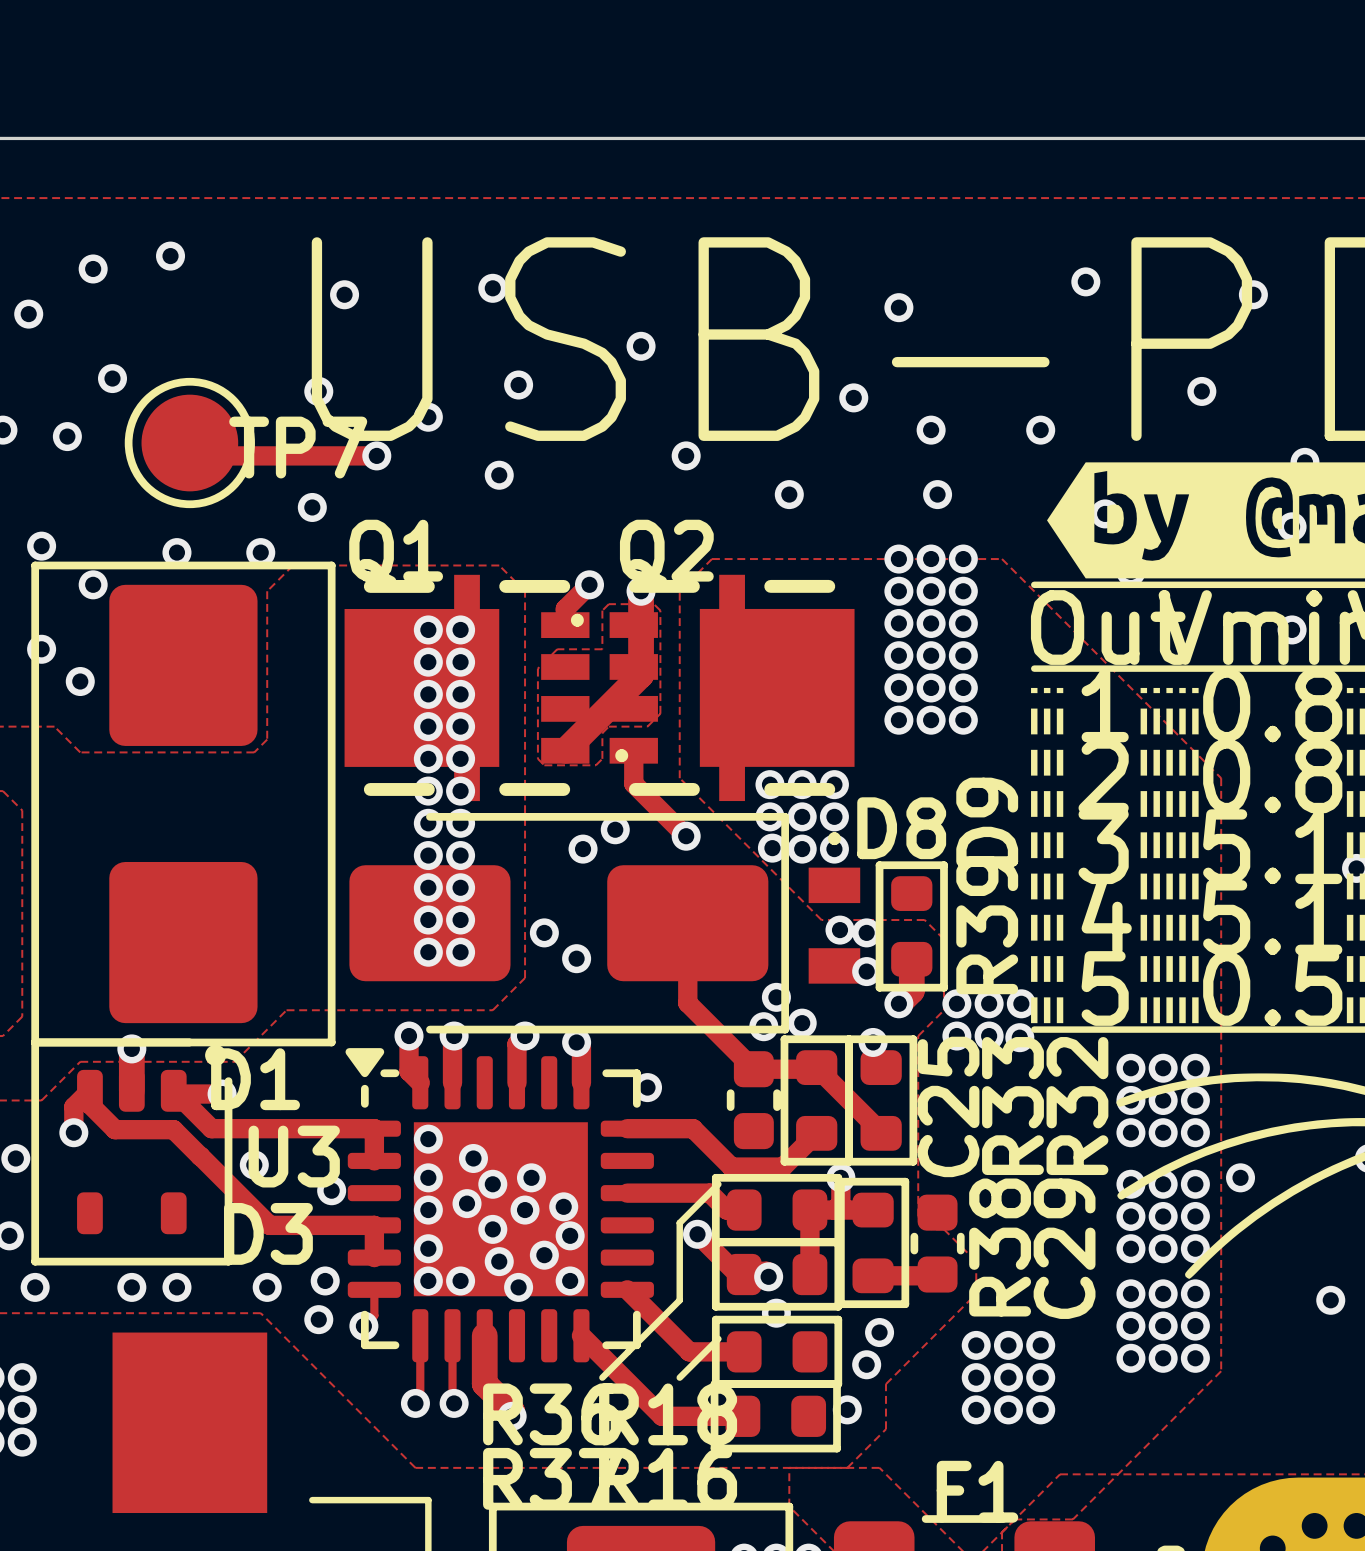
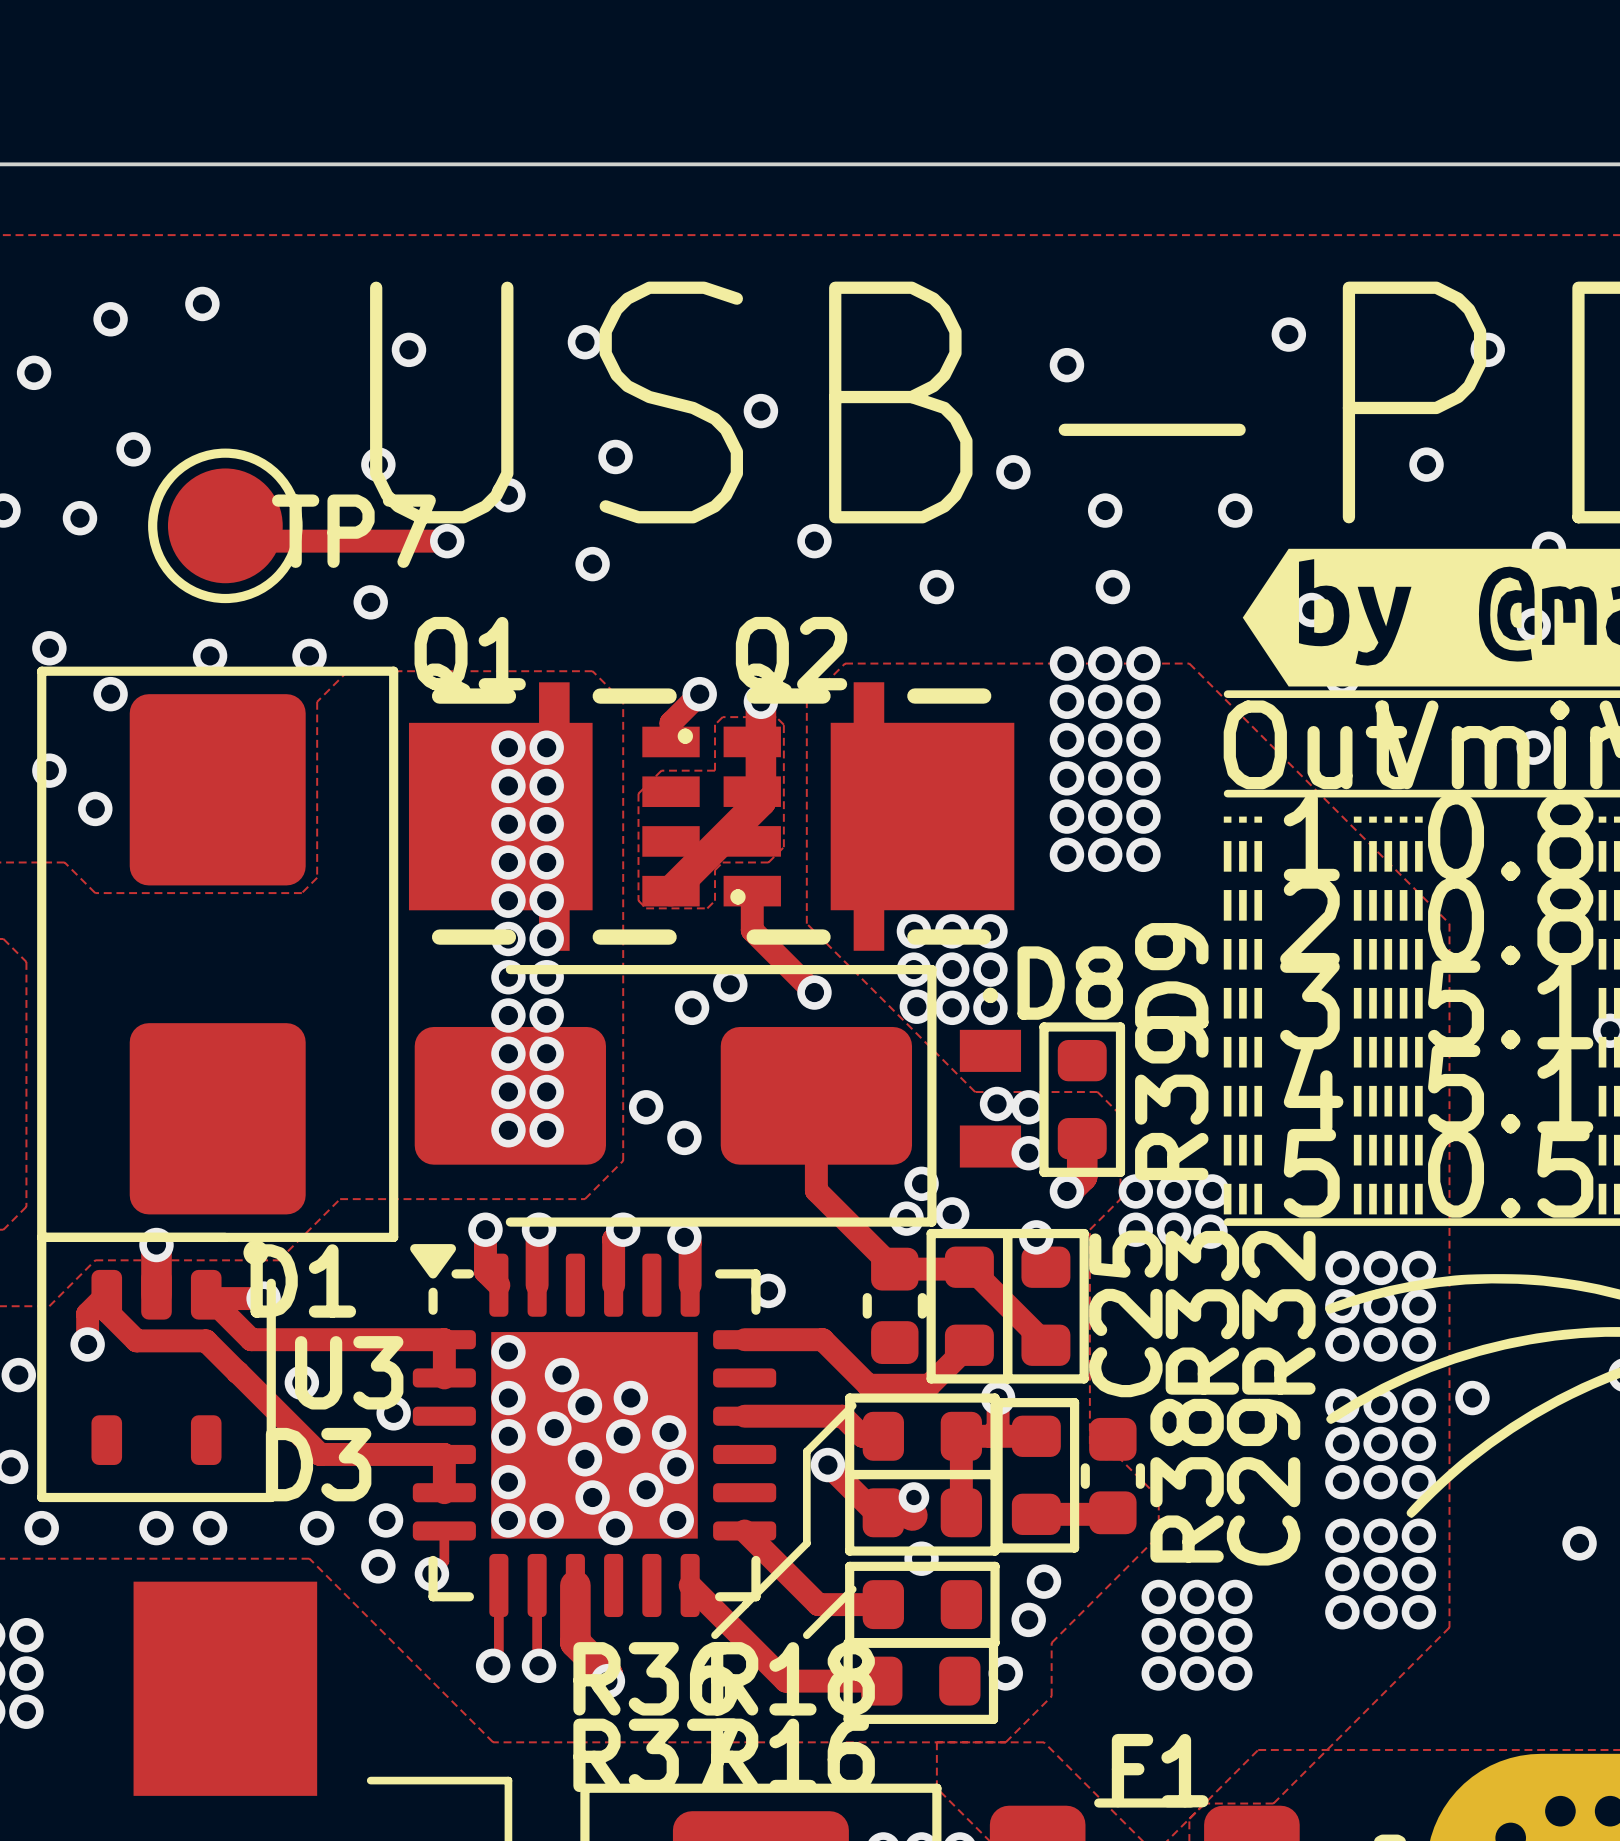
via position: (768, 1276) -> (913, 1497)

